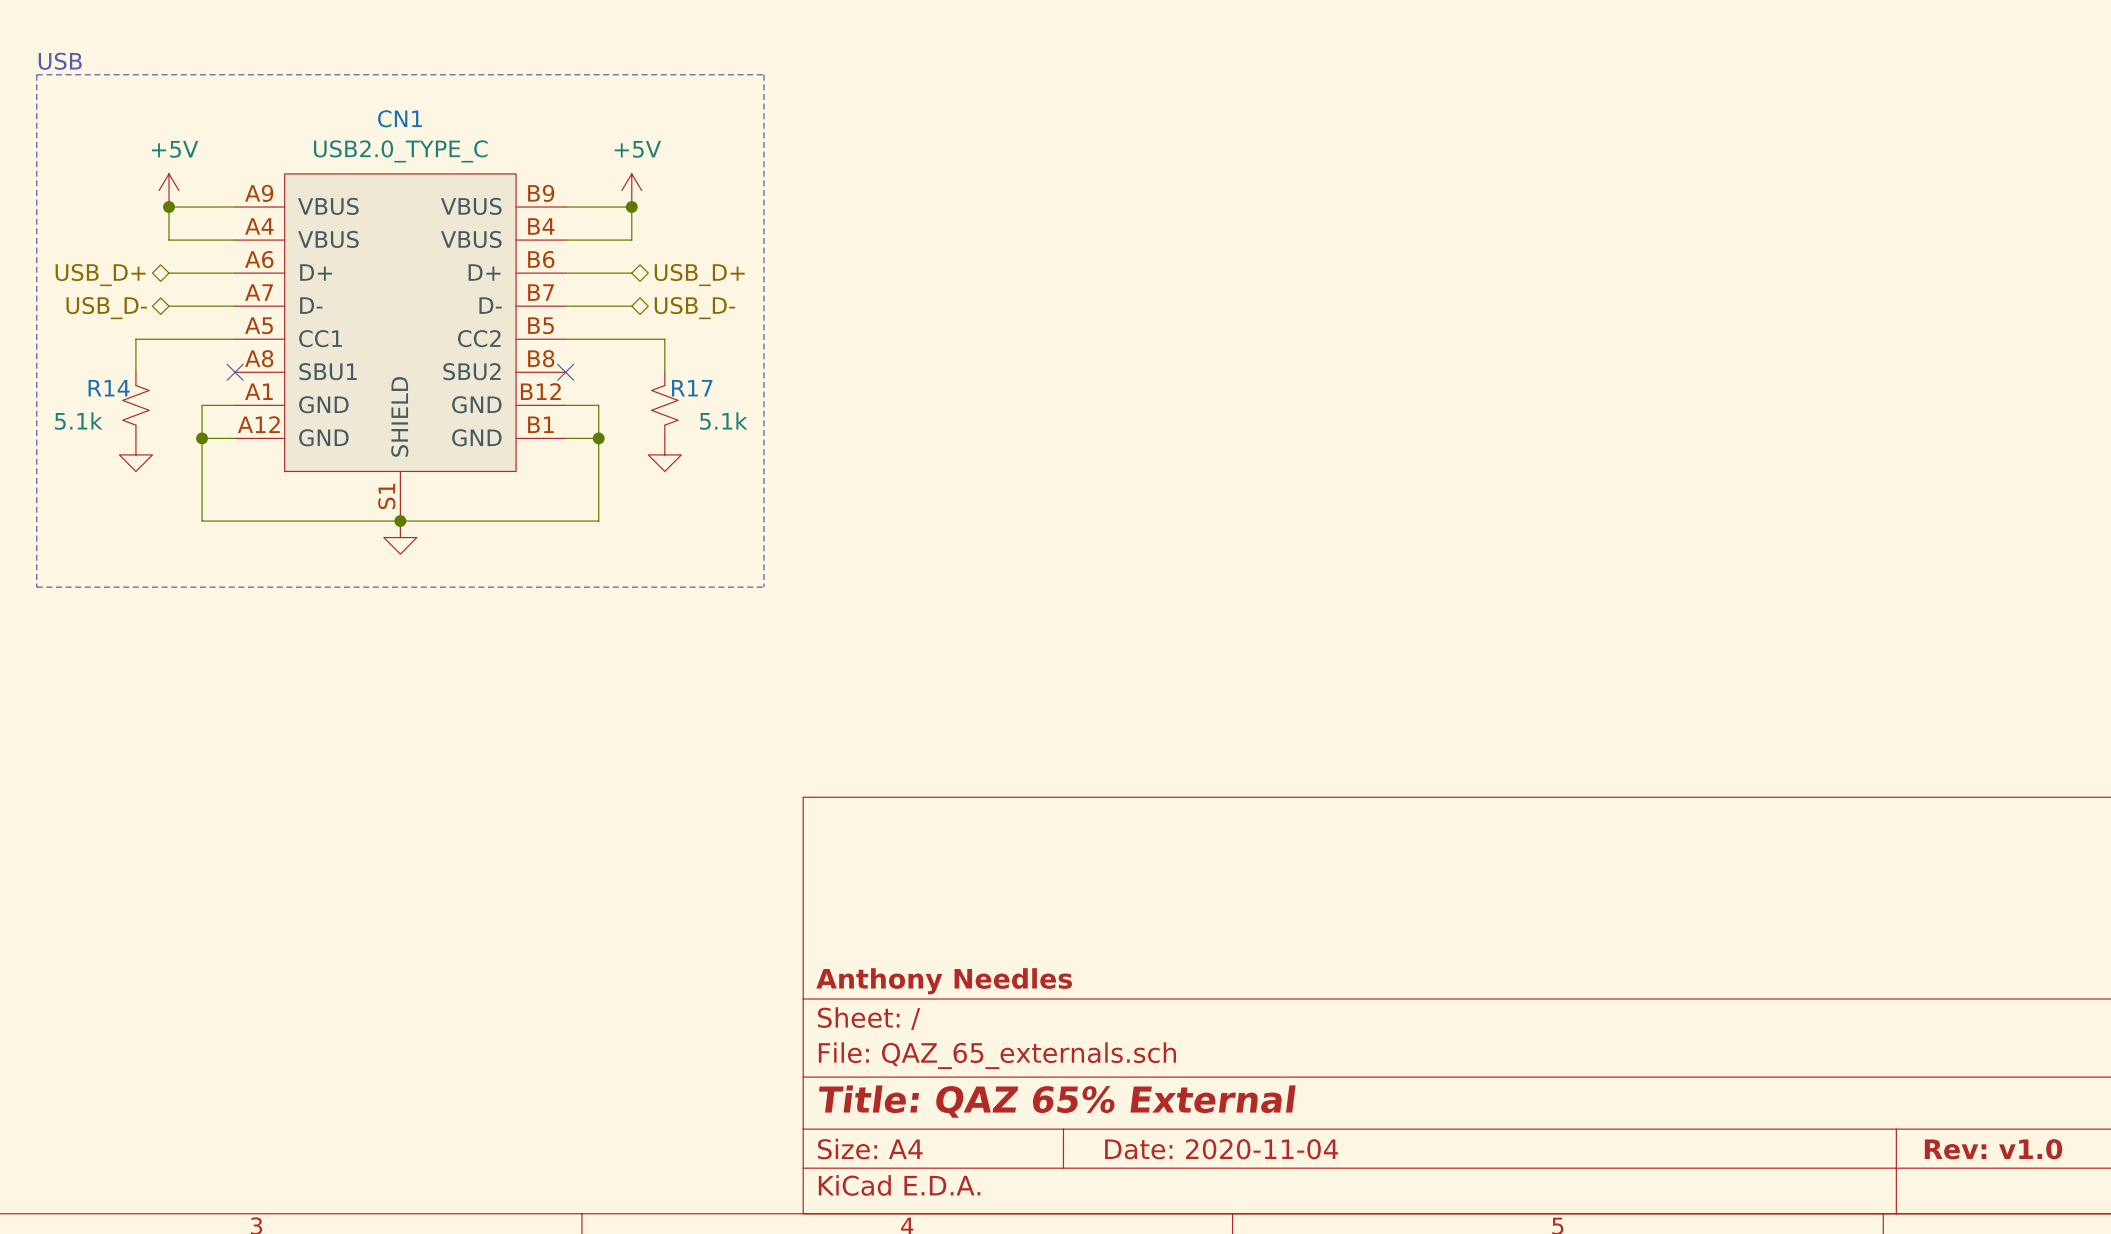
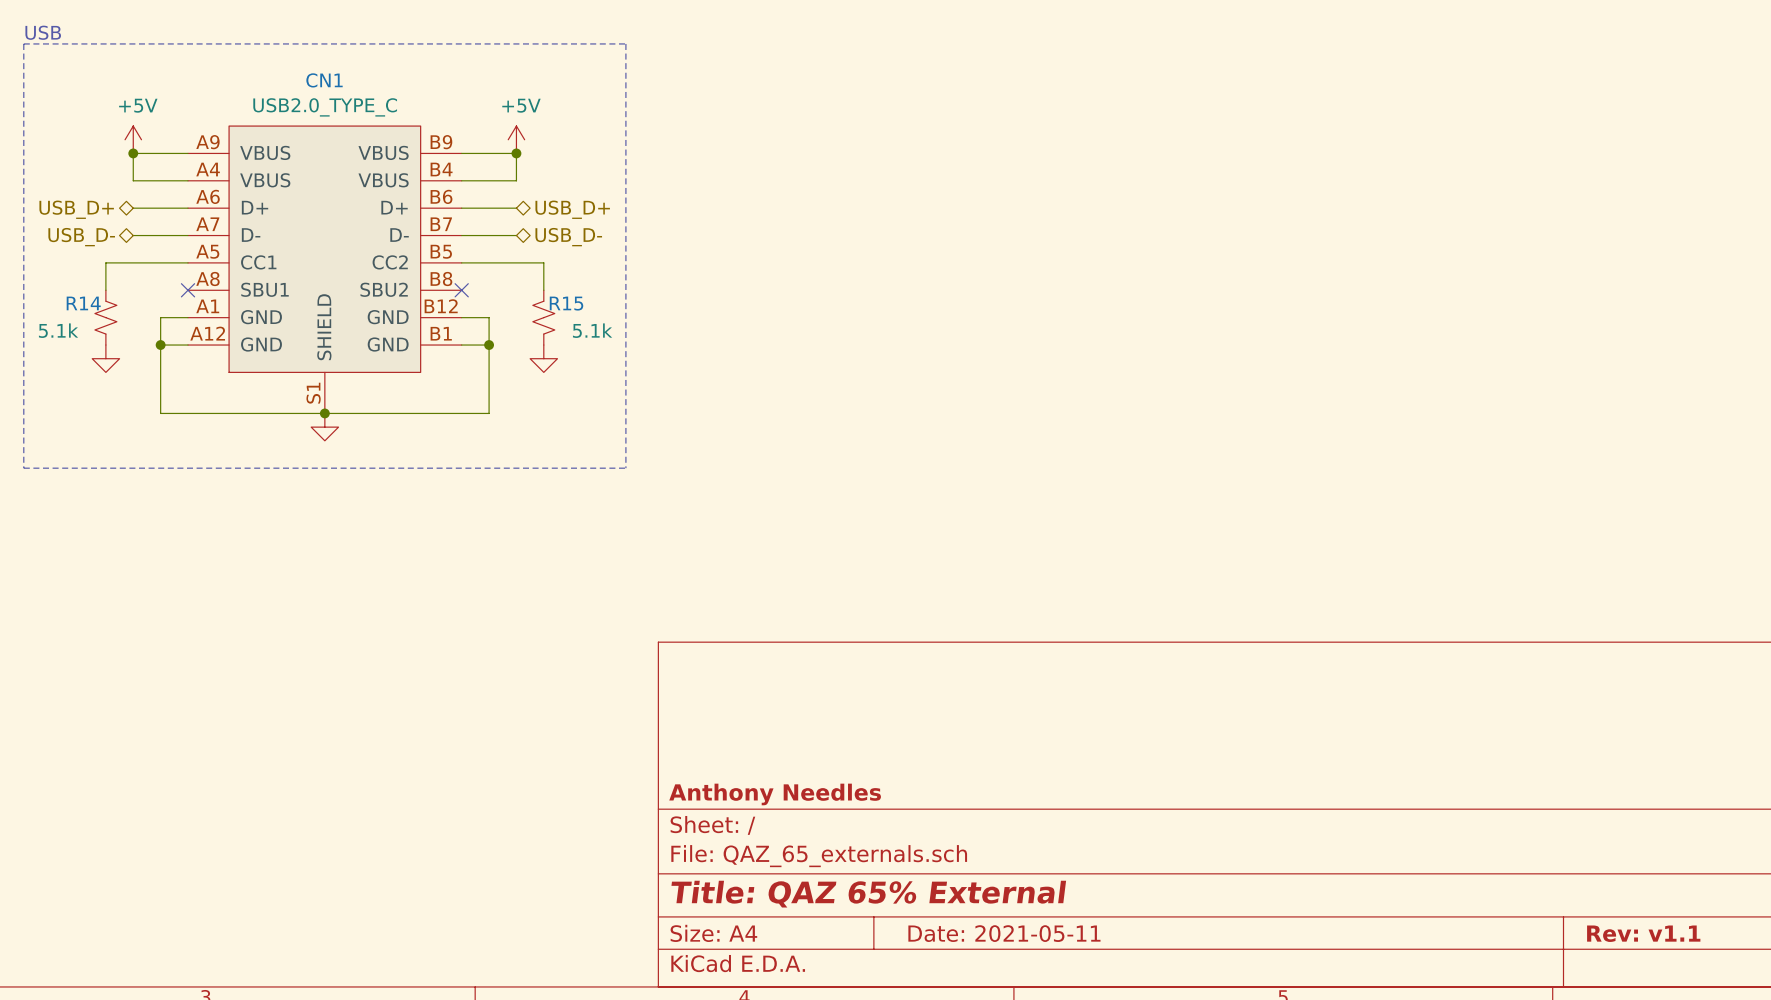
R17 name: R17 (692, 388) -> R15 (566, 303)
title block: Date: 2020-11-04 (1221, 1149) -> Date: 2021-05-11 (1004, 933)
title block: Rev: v1.0 (1993, 1149) -> Rev: v1.1 (1643, 933)

